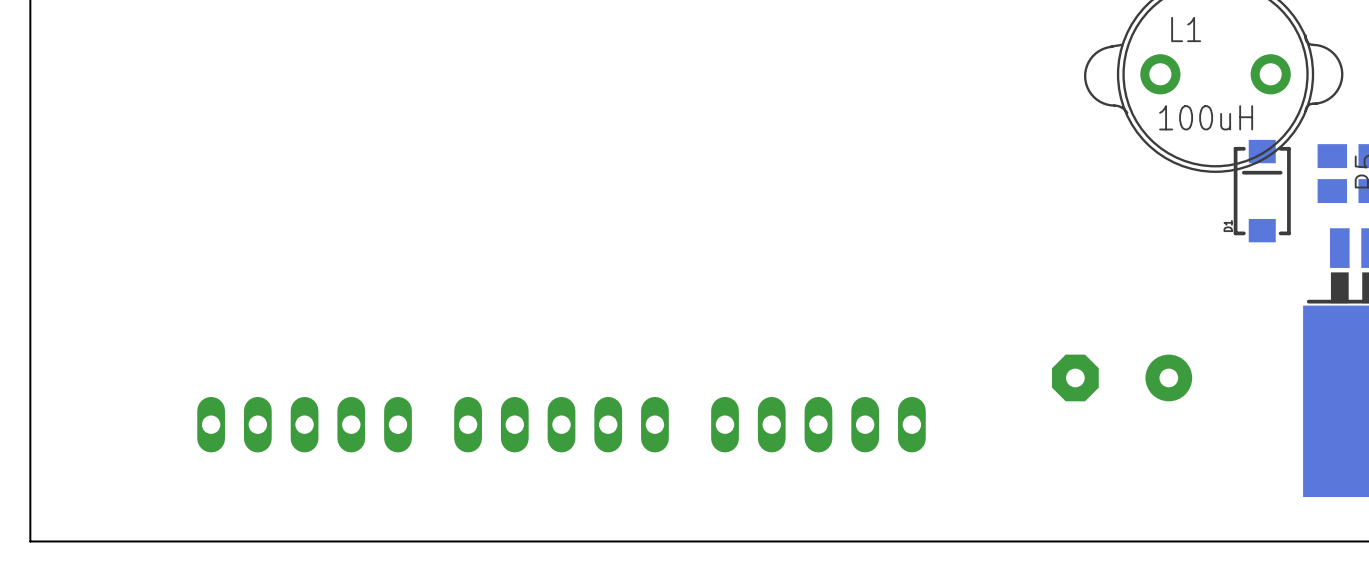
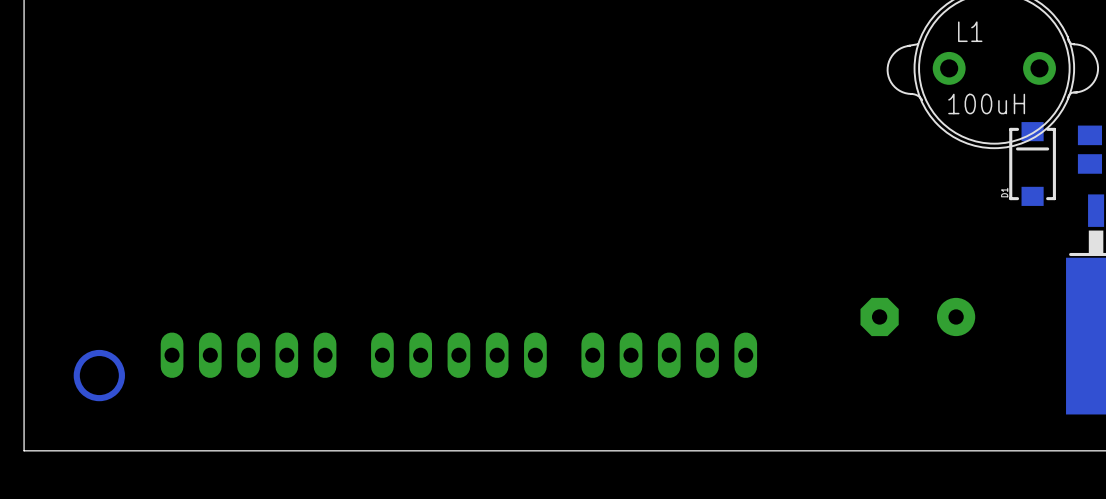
drawing: none -> [73, 349, 125, 402]

